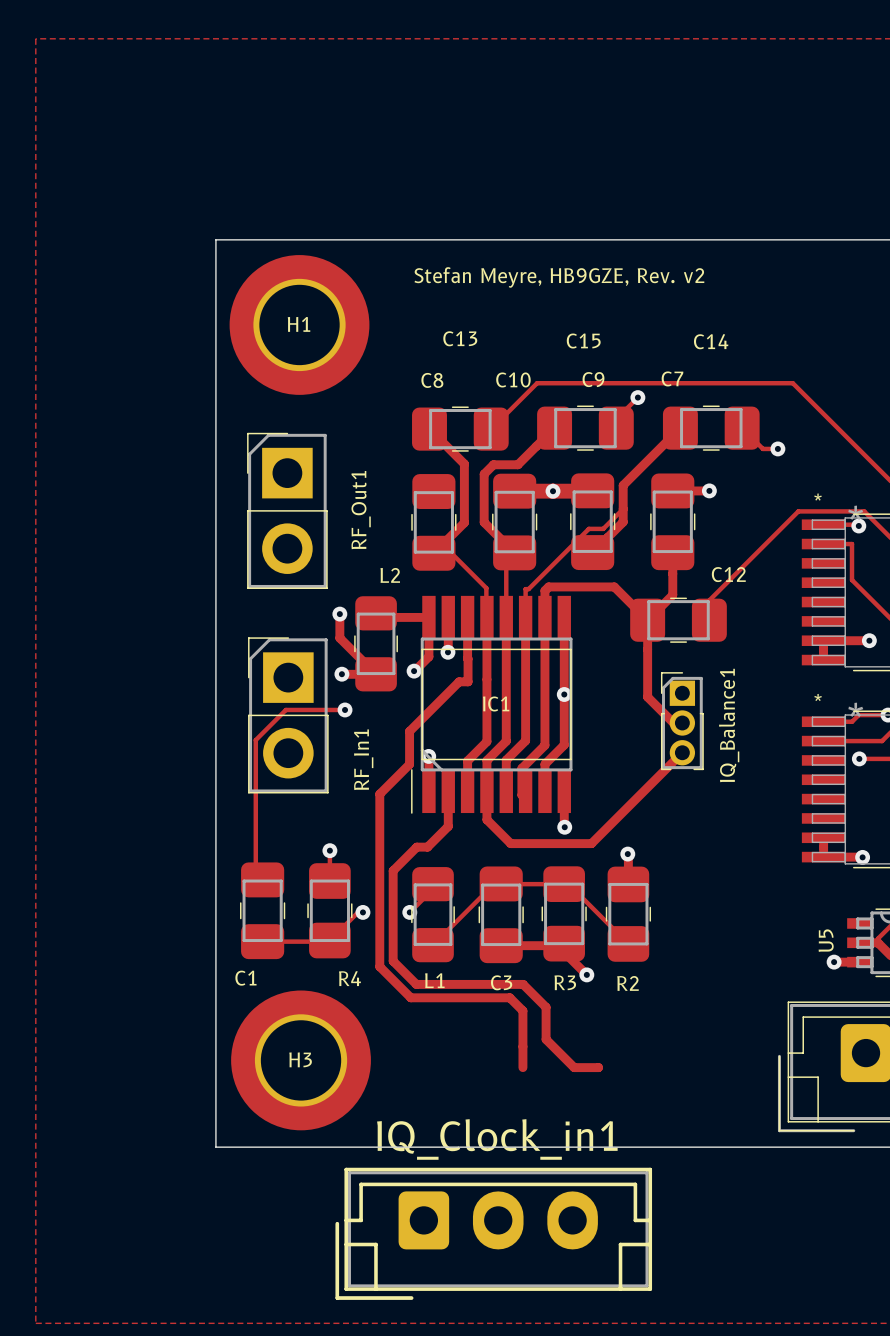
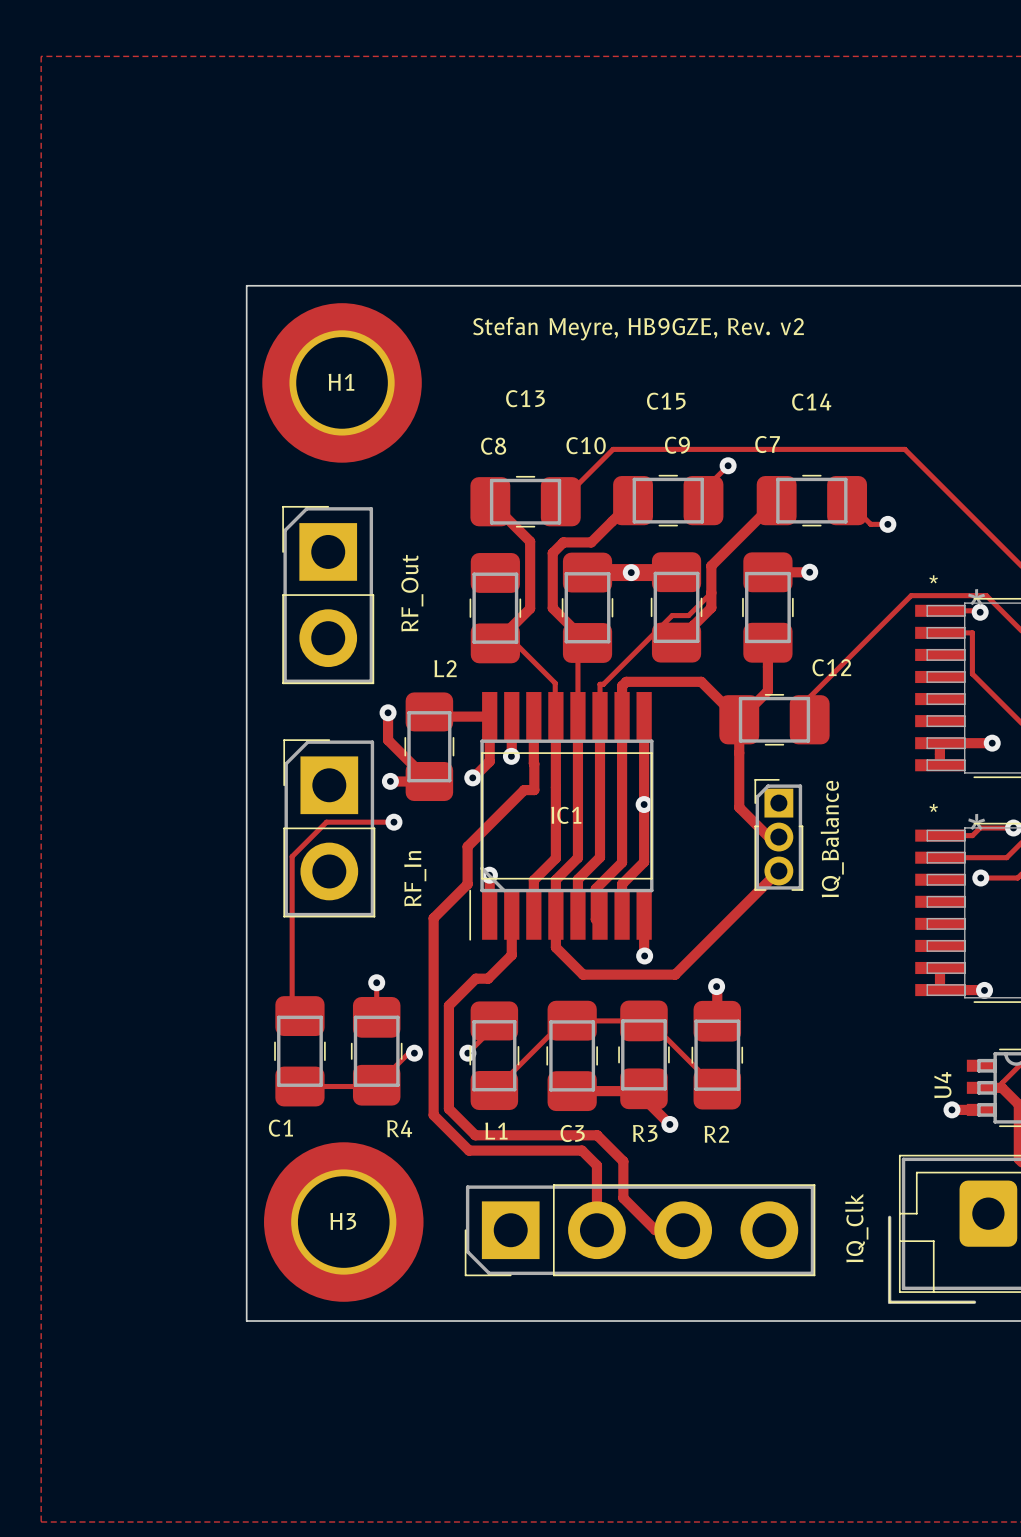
RF_Out1 name: RF_Out1 (361, 510) -> RF_Out (412, 593)
IQ_Balance1 name: IQ_Balance1 (729, 725) -> IQ_Balance (832, 839)
RF_In1 name: RF_In1 (363, 759) -> RF_In (415, 878)
U5 name: U5 (826, 940) -> U4 (942, 1085)
IQ_Clk: none -> (640, 1230)
IQ_Clock_in1: (493, 1233) -> none

